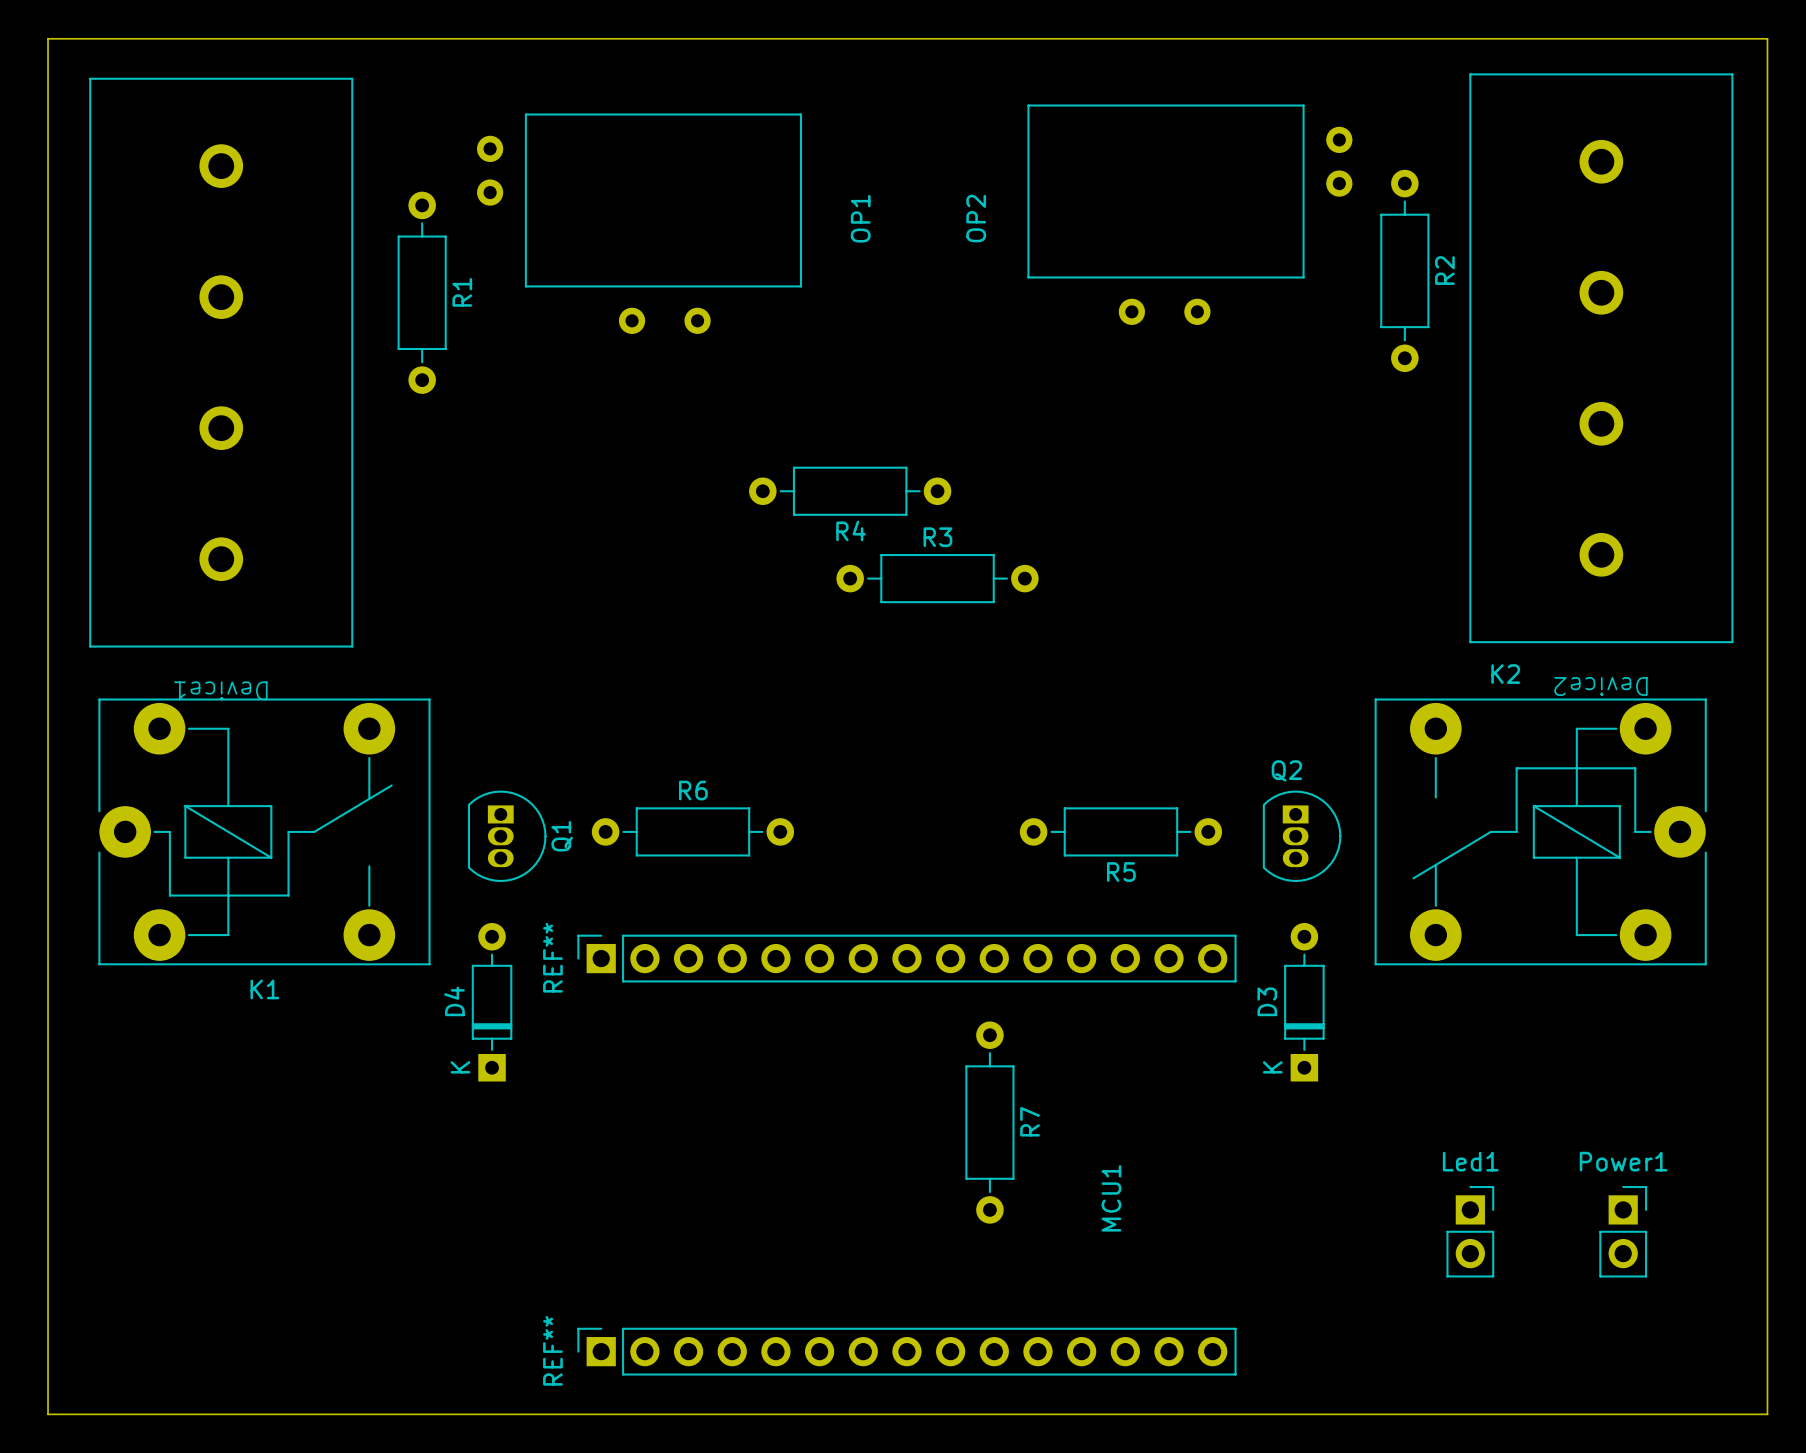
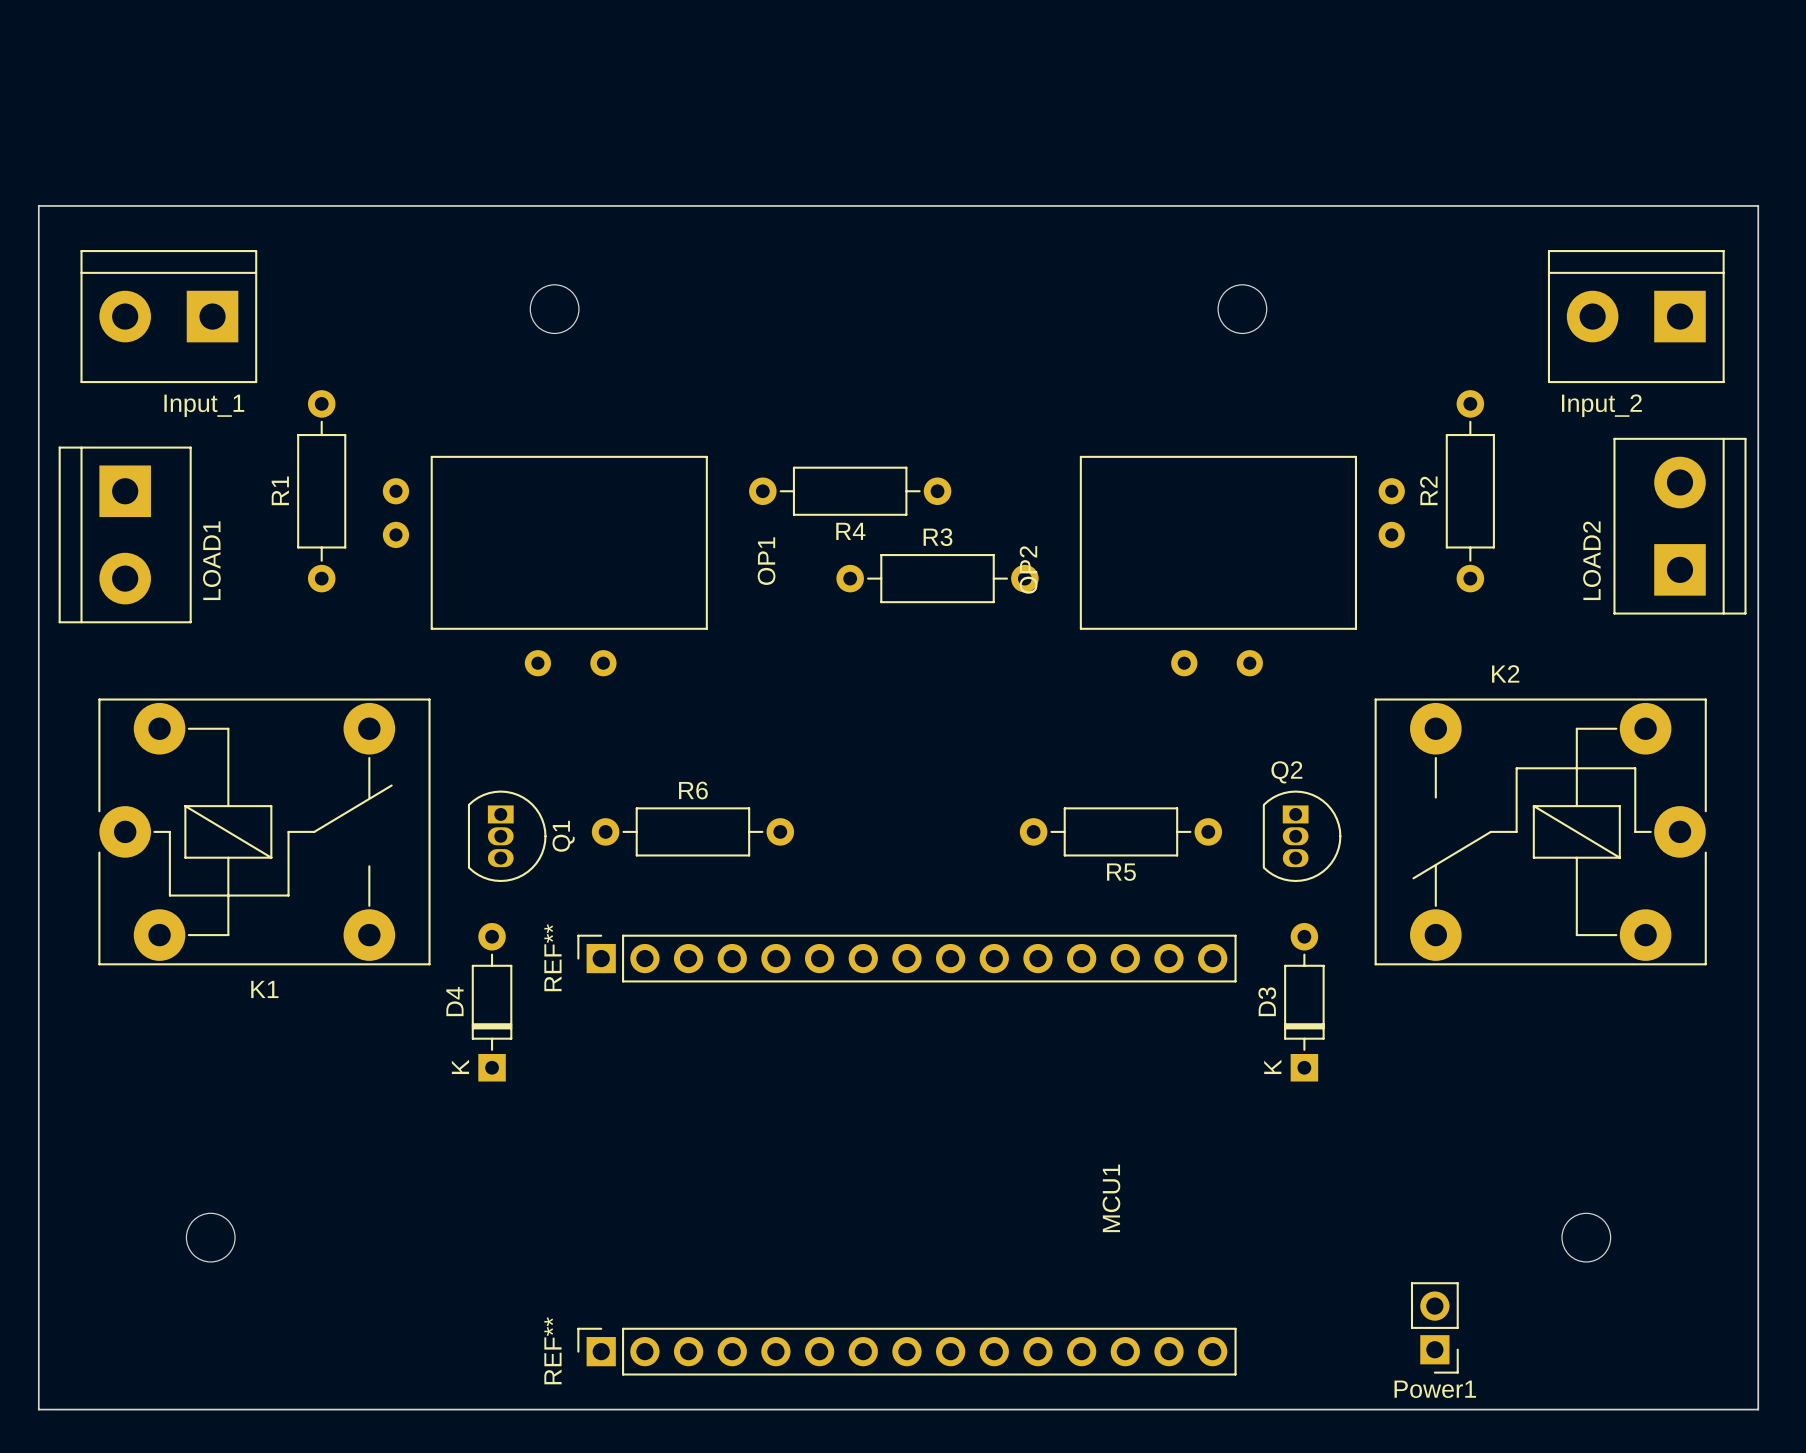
board edge: (48, 38) (48, 1414) (1767, 1414) (1767, 38) (48, 38) -> (38, 205) (38, 1409) (1758, 1409) (1758, 205) (38, 205)
OP2 position: (1189, 214) -> (1242, 566)
OP1 position: (639, 223) -> (545, 566)
R2 position: (1404, 270) -> (1470, 491)
R2 name position: R2 (1444, 270) -> R2 (1428, 490)
round board edge: none -> [529, 284, 580, 334]
round board edge: none -> [1217, 284, 1268, 334]
R1 position: (422, 292) -> (321, 491)
R1 name position: R1 (462, 292) -> R1 (280, 490)
Input_1: none -> (168, 316)
Input_2: none -> (1636, 316)
Device2: (1601, 358) -> none
Device1: (221, 362) -> none
LOAD2: none -> (1679, 526)
LOAD1: none -> (125, 534)
R7: (989, 1122) -> none
Power1 name position: Power1 (1623, 1161) -> Power1 (1435, 1389)
Power1 footprint: [1599, 1186, 1648, 1278] -> [1410, 1282, 1459, 1374]
round board edge: none -> [185, 1212, 236, 1263]
round board edge: none -> [1561, 1212, 1612, 1263]
Led1: (1470, 1231) -> none

